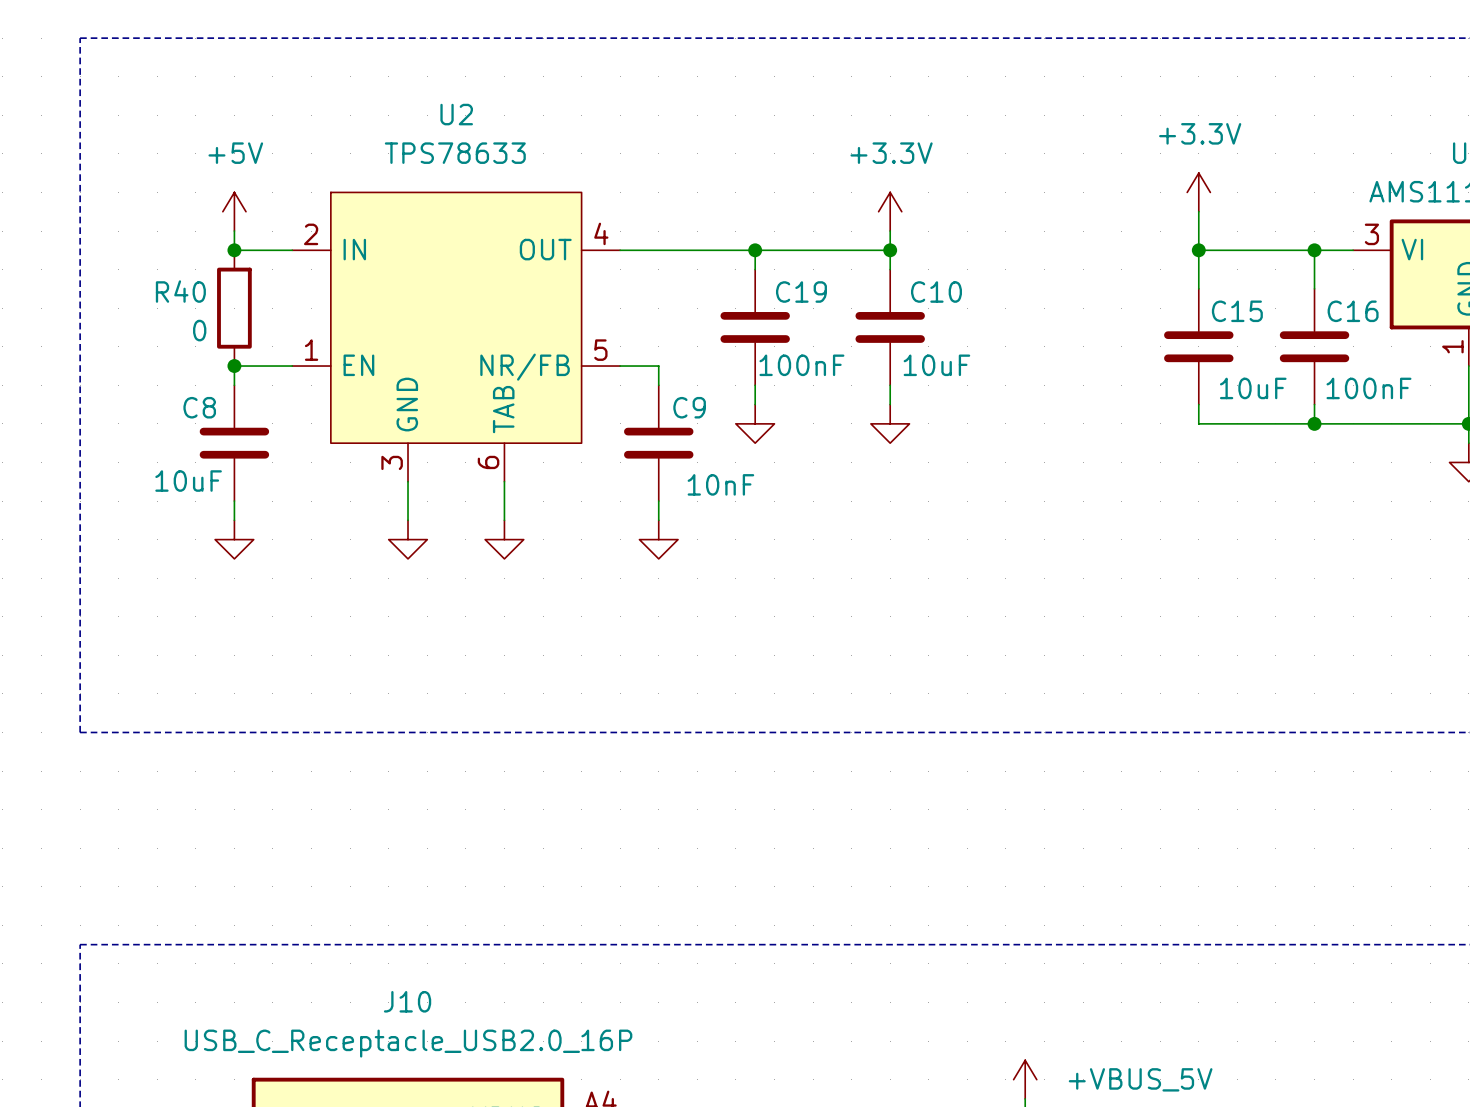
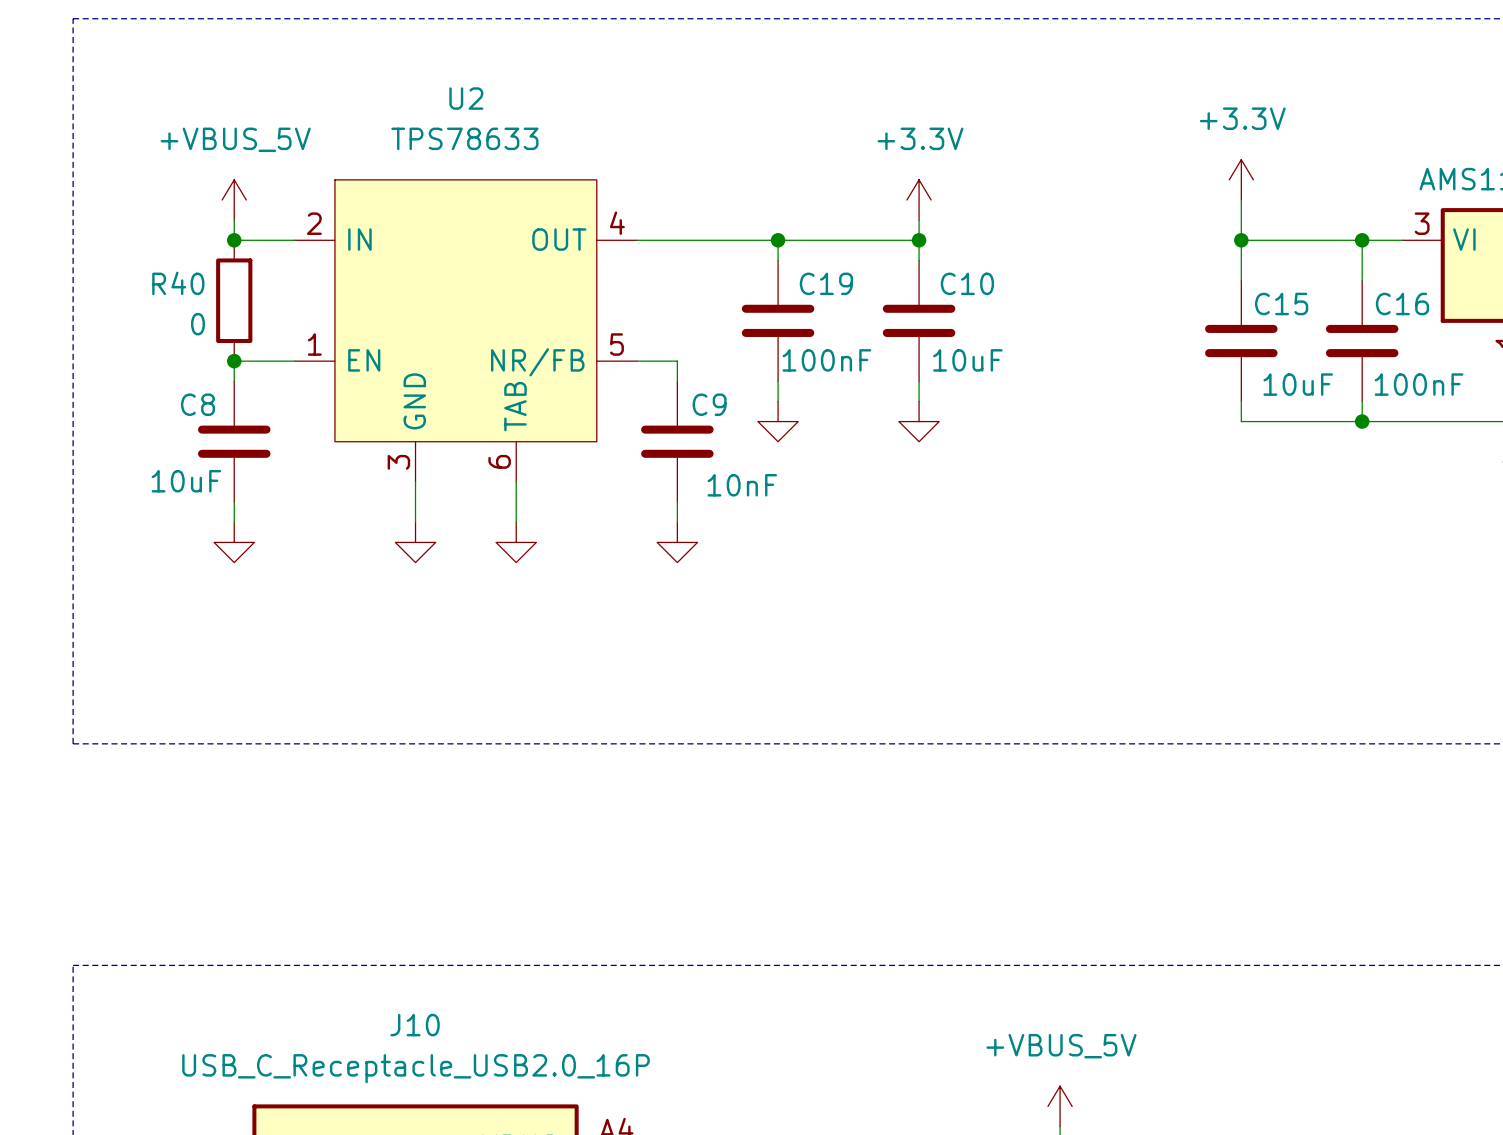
power symbol: +5V (234, 211) -> +VBUS_5V (234, 200)
power symbol text position: +VBUS_5V (1140, 1079) -> +VBUS_5V (1061, 1046)

